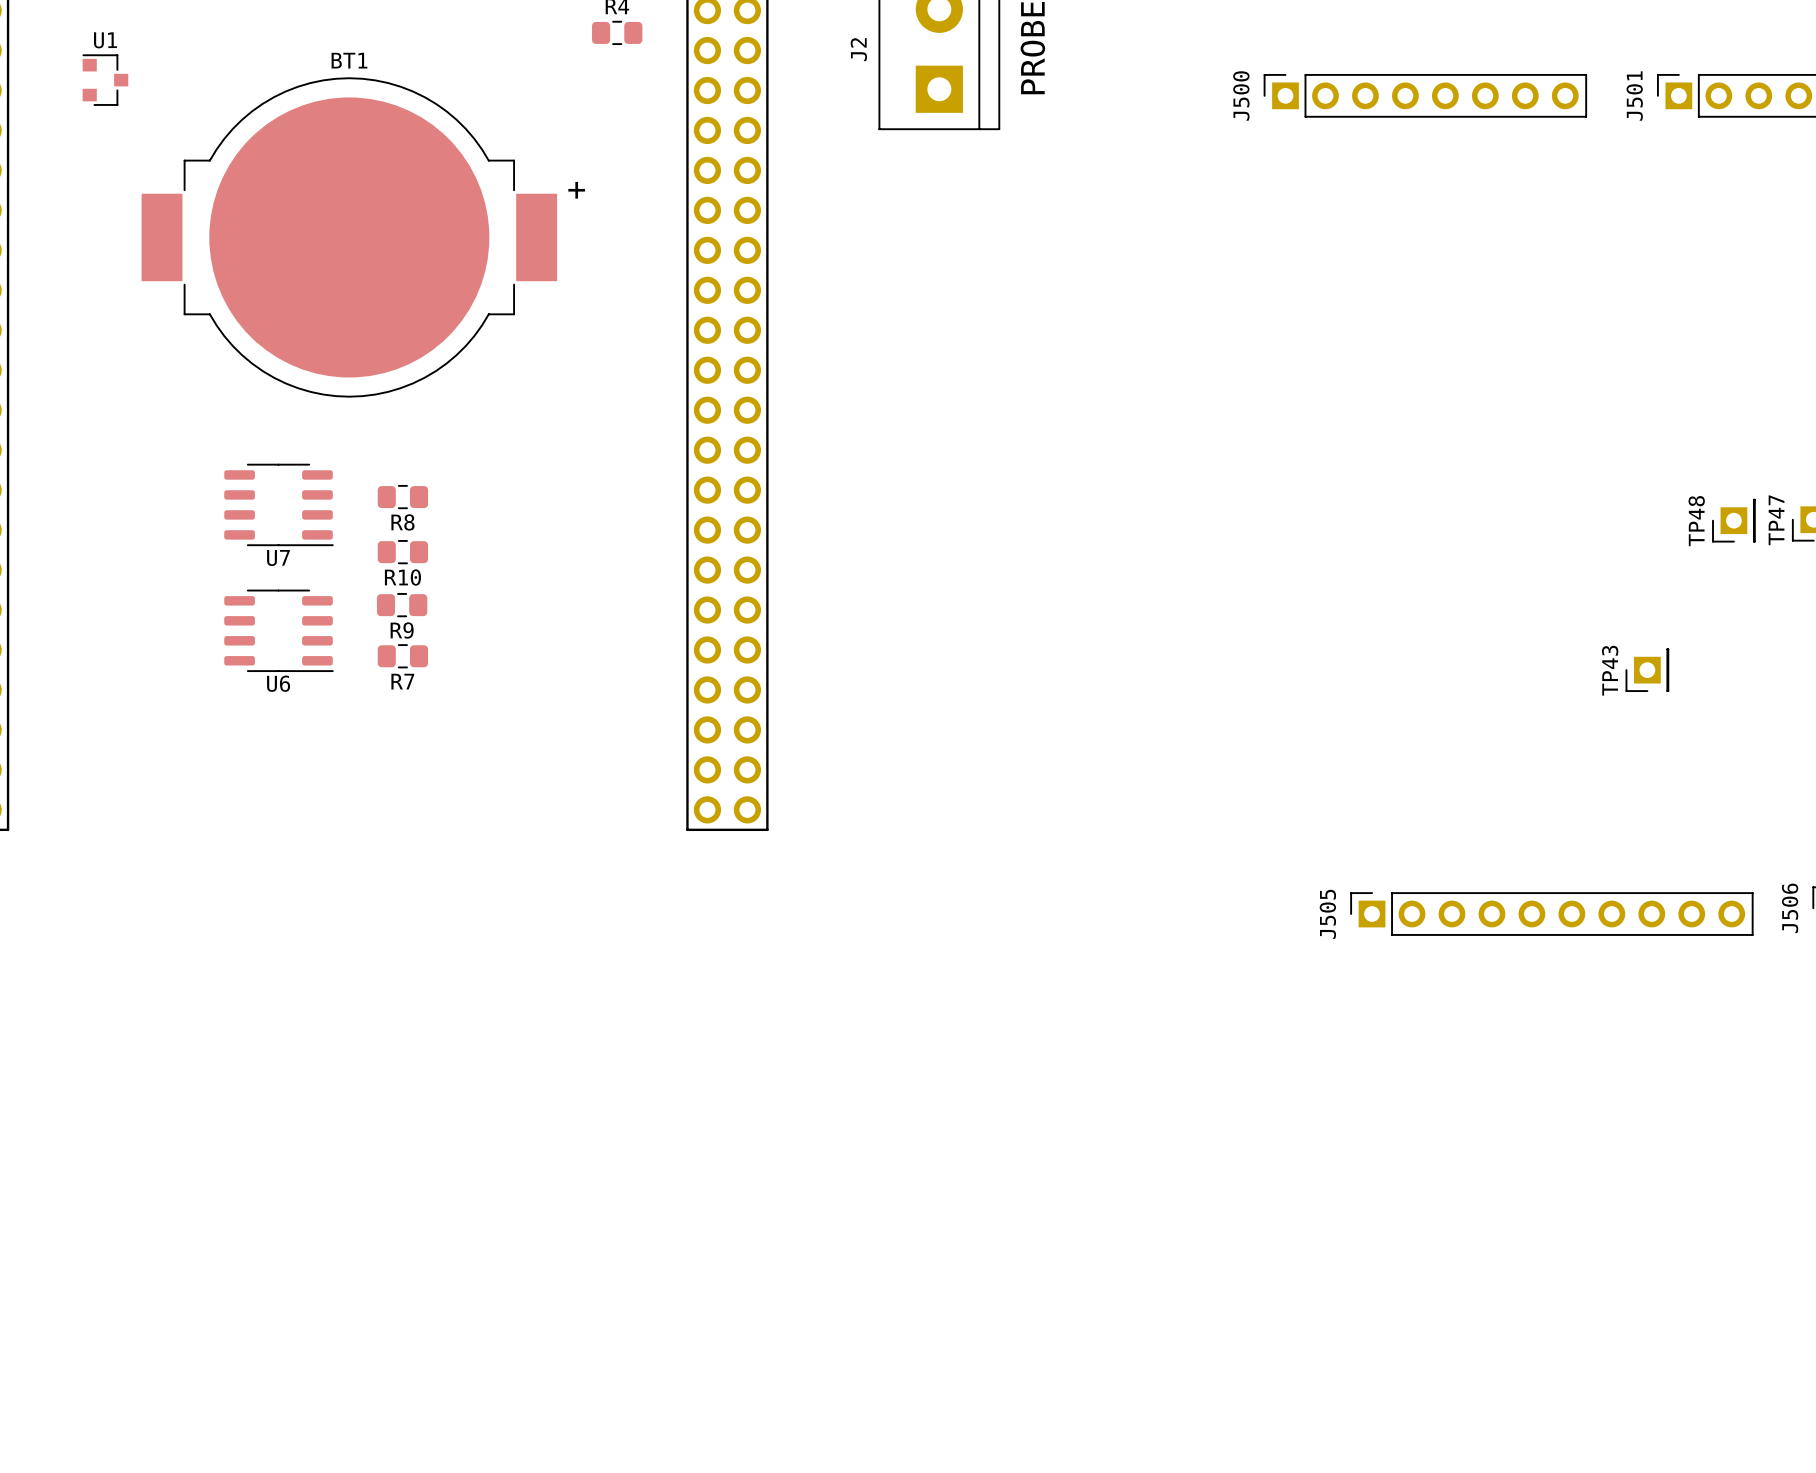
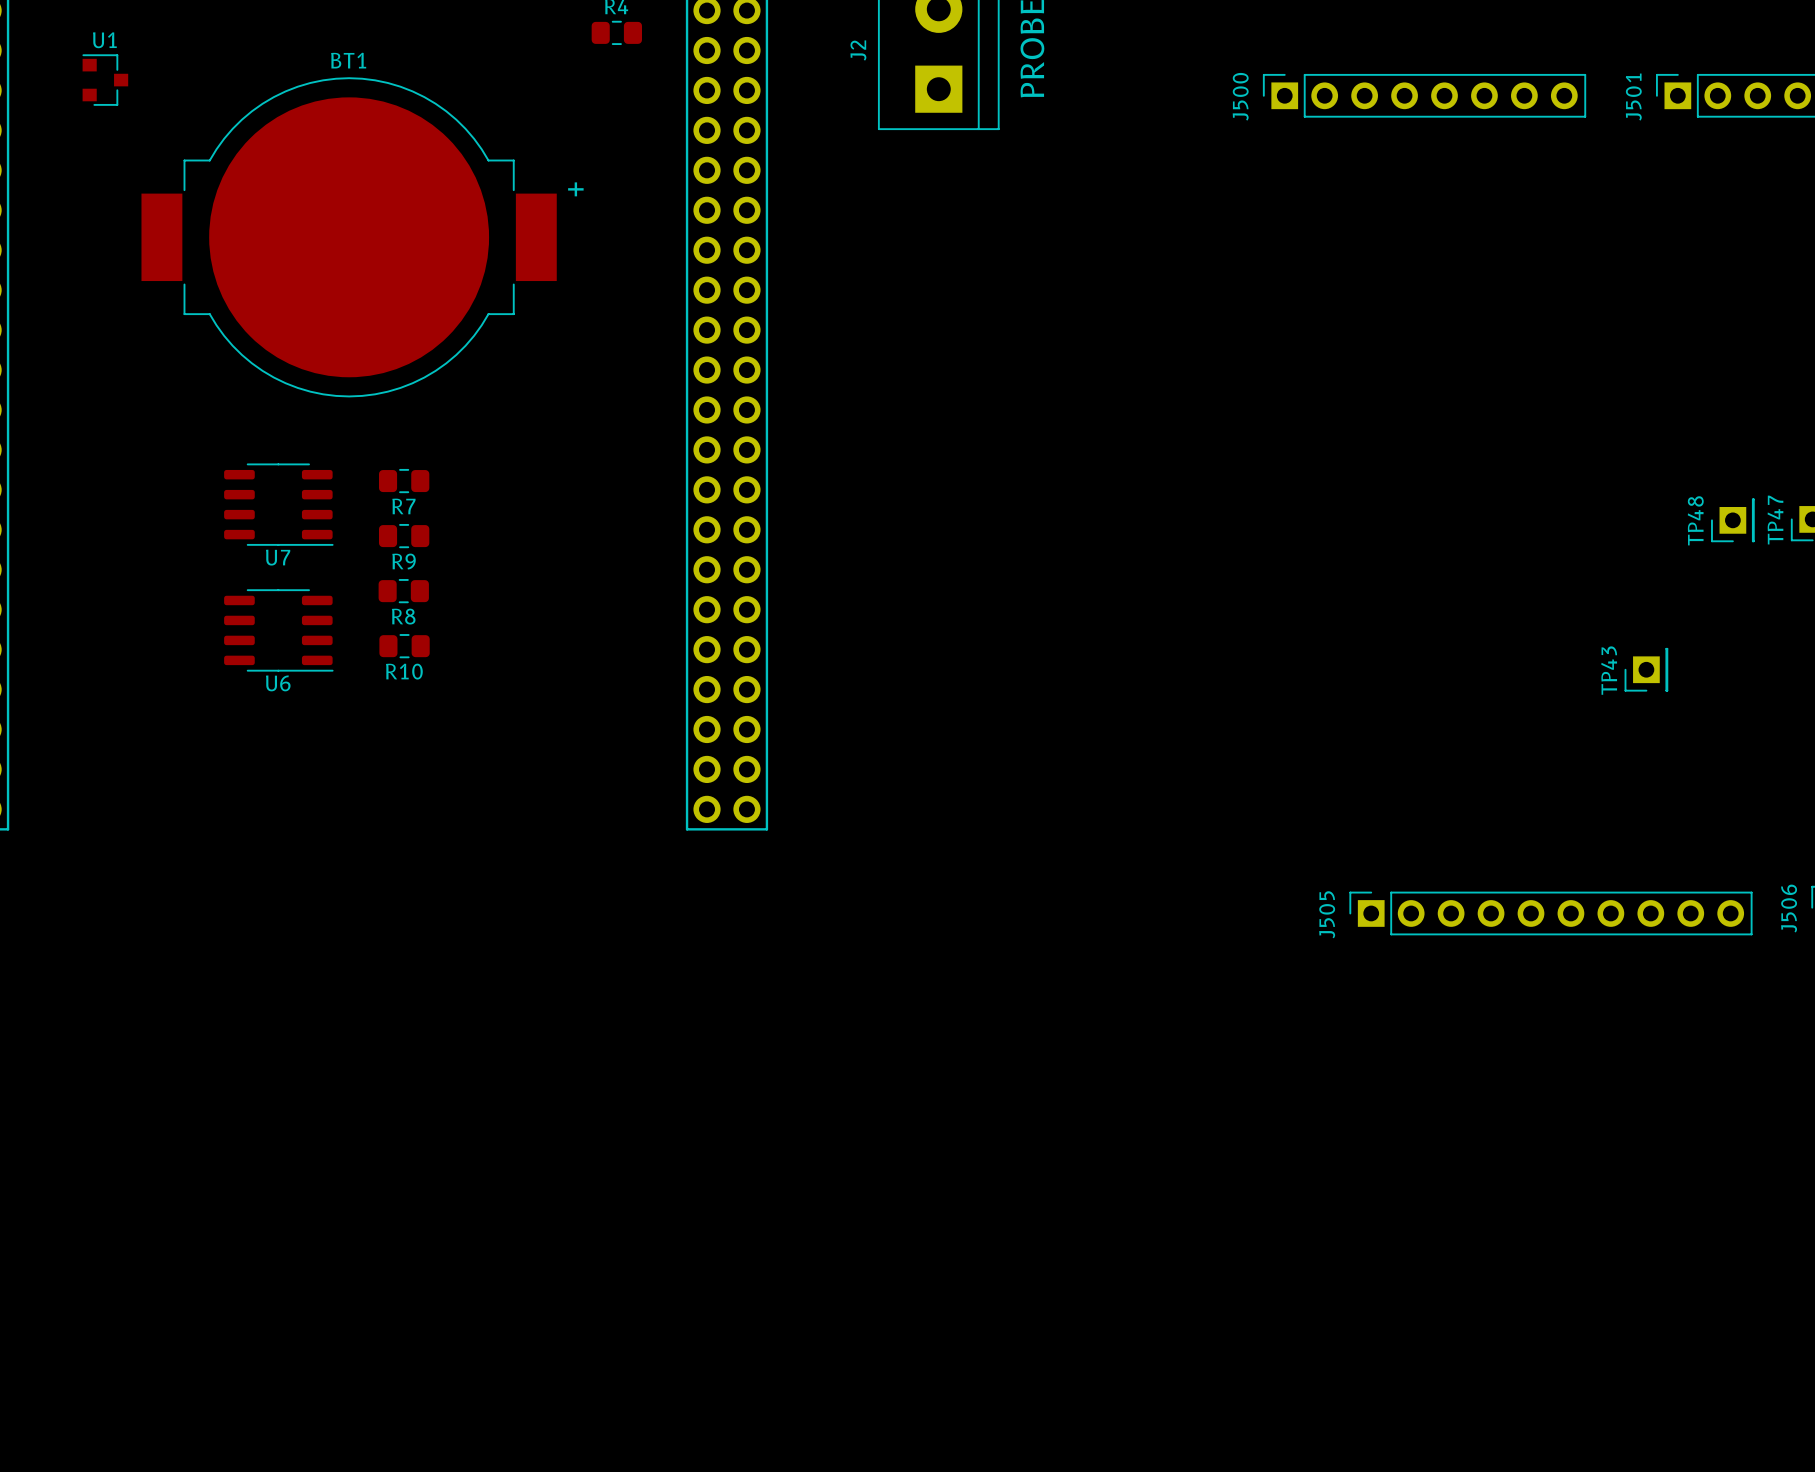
R8 position: (402, 497) -> (403, 591)
R10 position: (402, 552) -> (404, 646)
R9 position: (402, 605) -> (404, 536)
R7 position: (402, 656) -> (404, 481)

